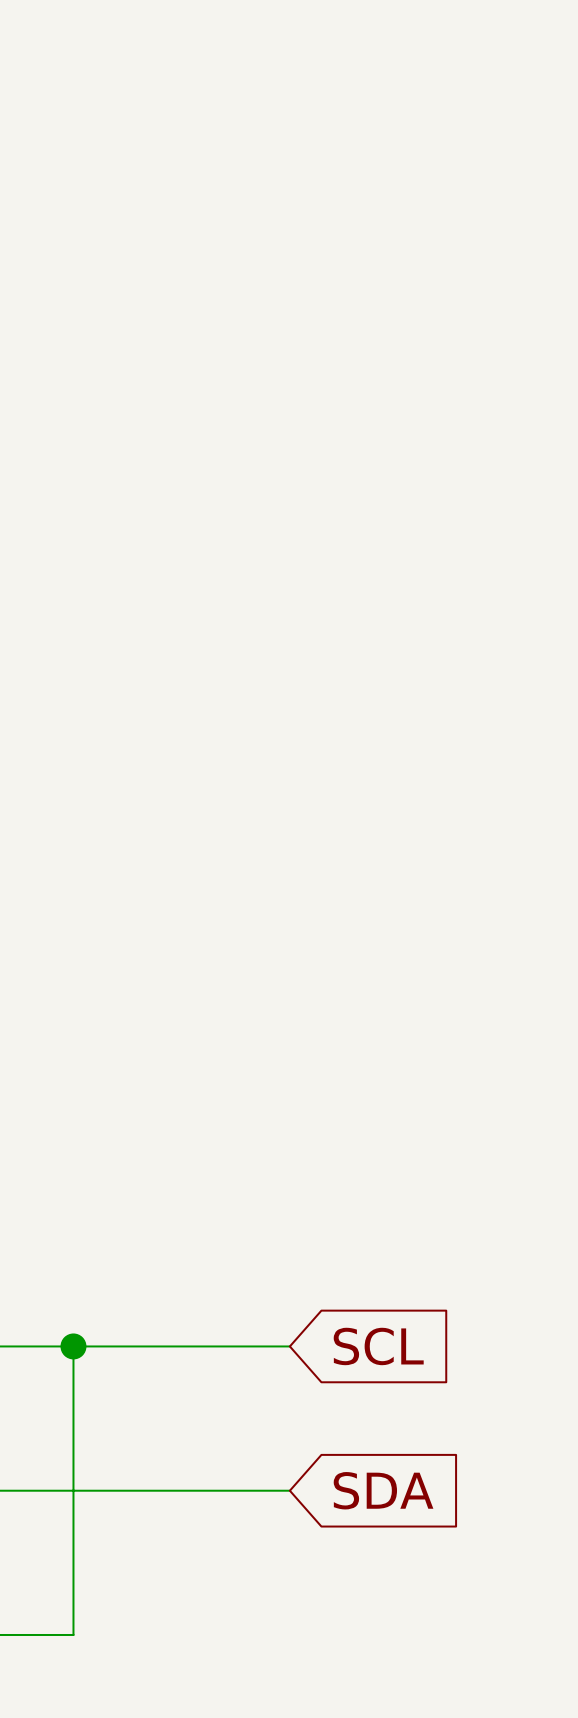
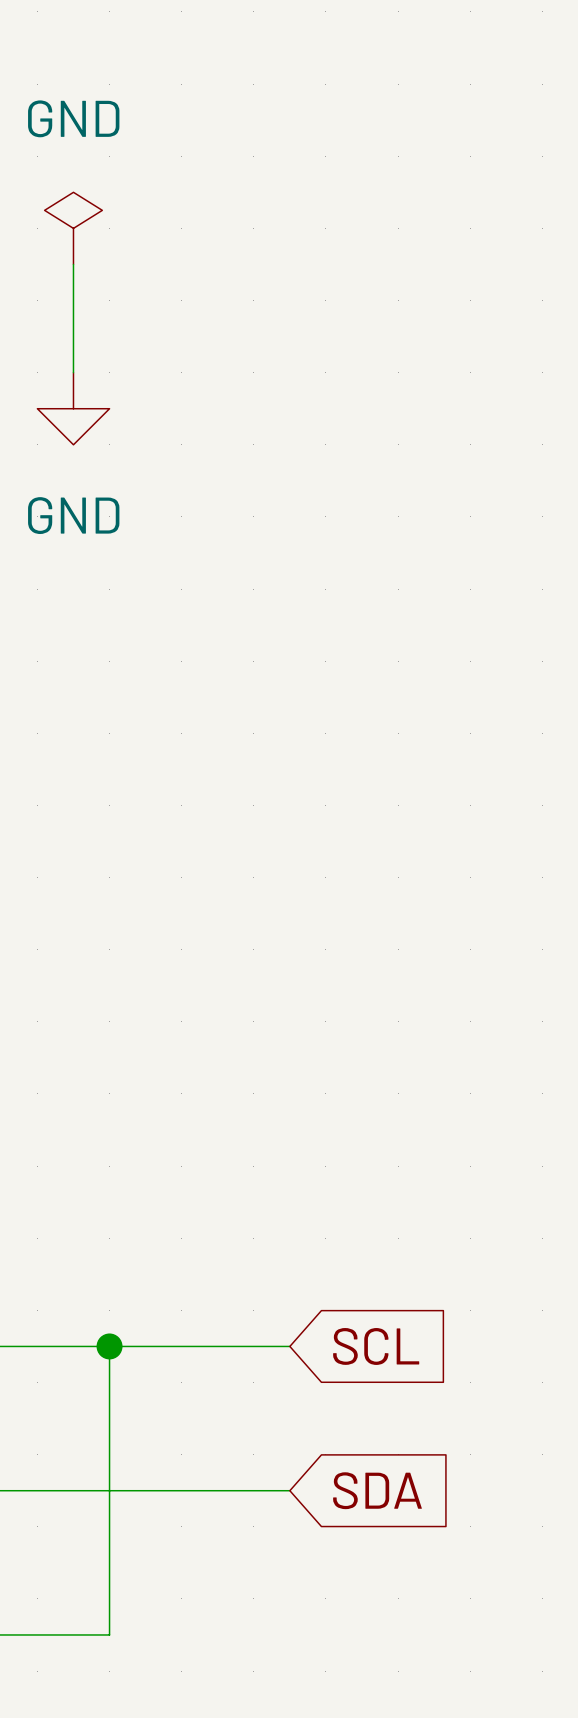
power symbol: none -> GND (73, 228)
wire: none -> (73, 264) (73, 372)
power symbol: none -> GND (73, 408)
wire: (73, 1346) (73, 1634) -> (109, 1346) (109, 1634) (73, 1634)
junction position: (73, 1346) -> (109, 1346)

